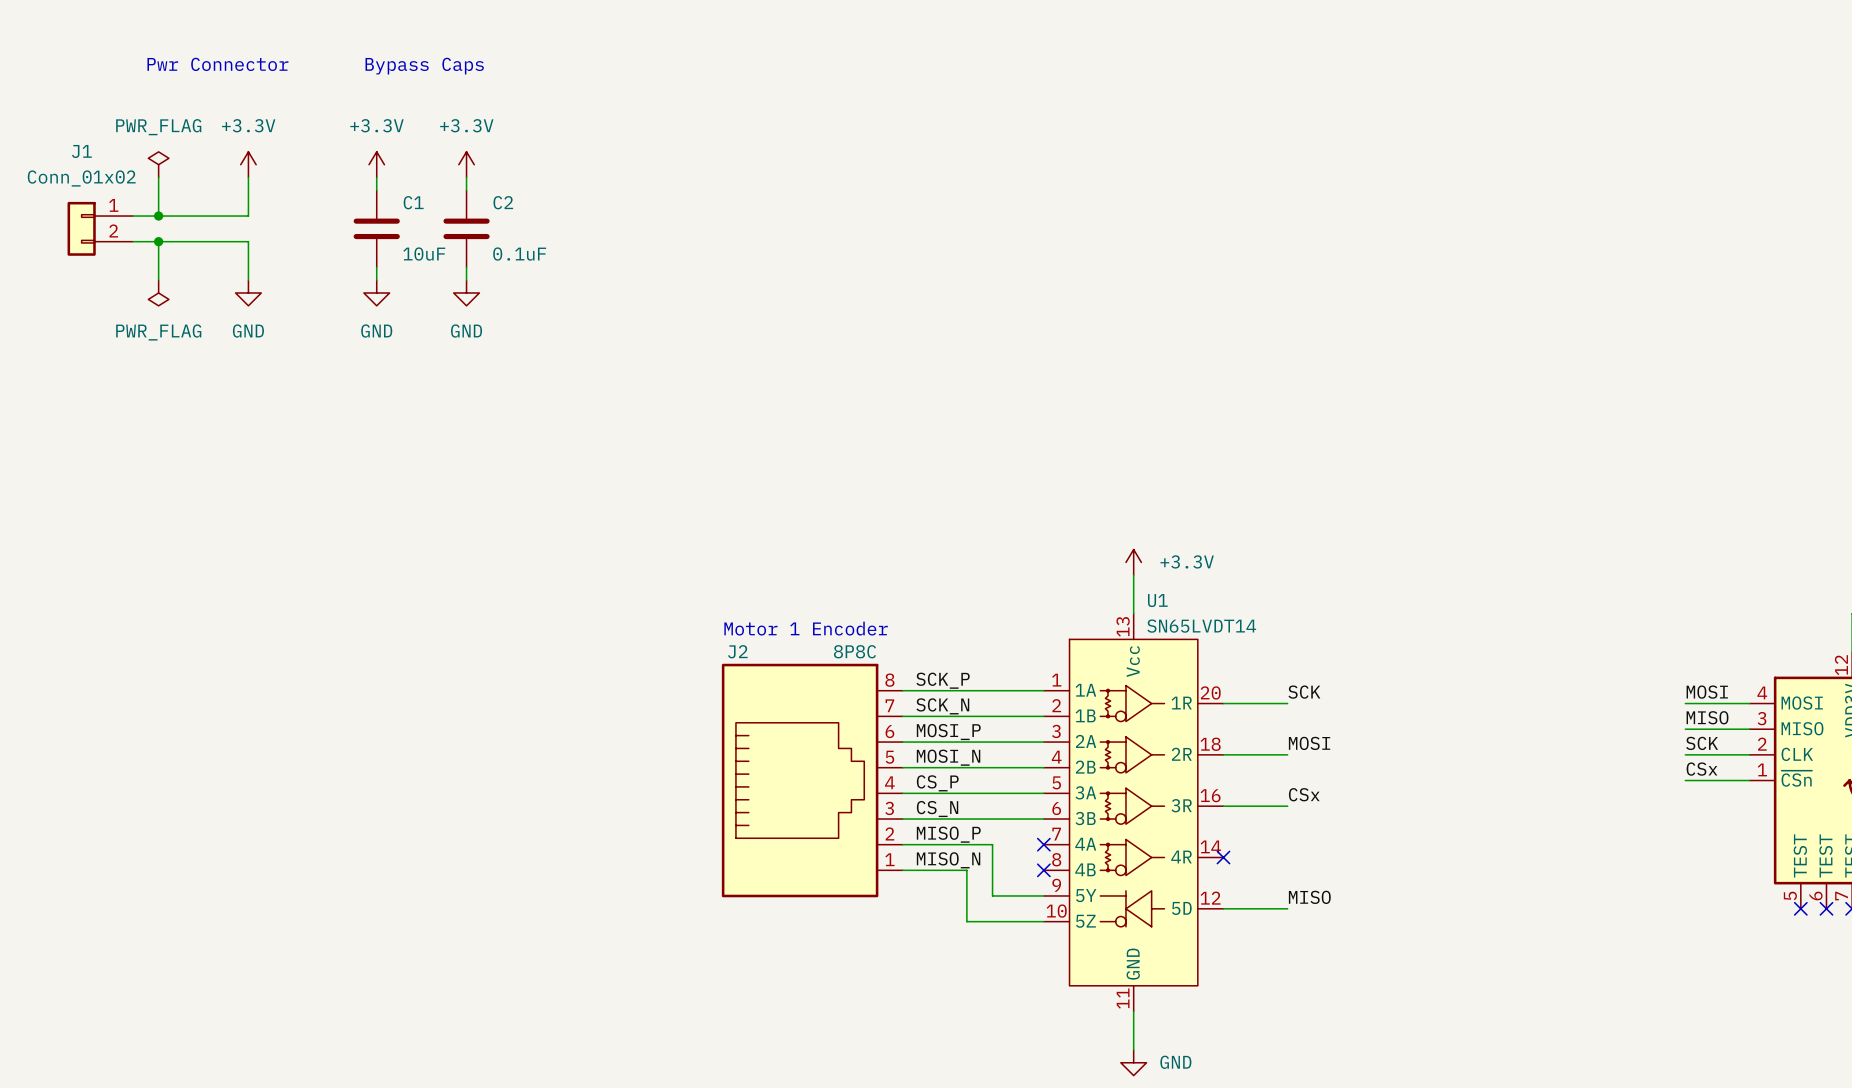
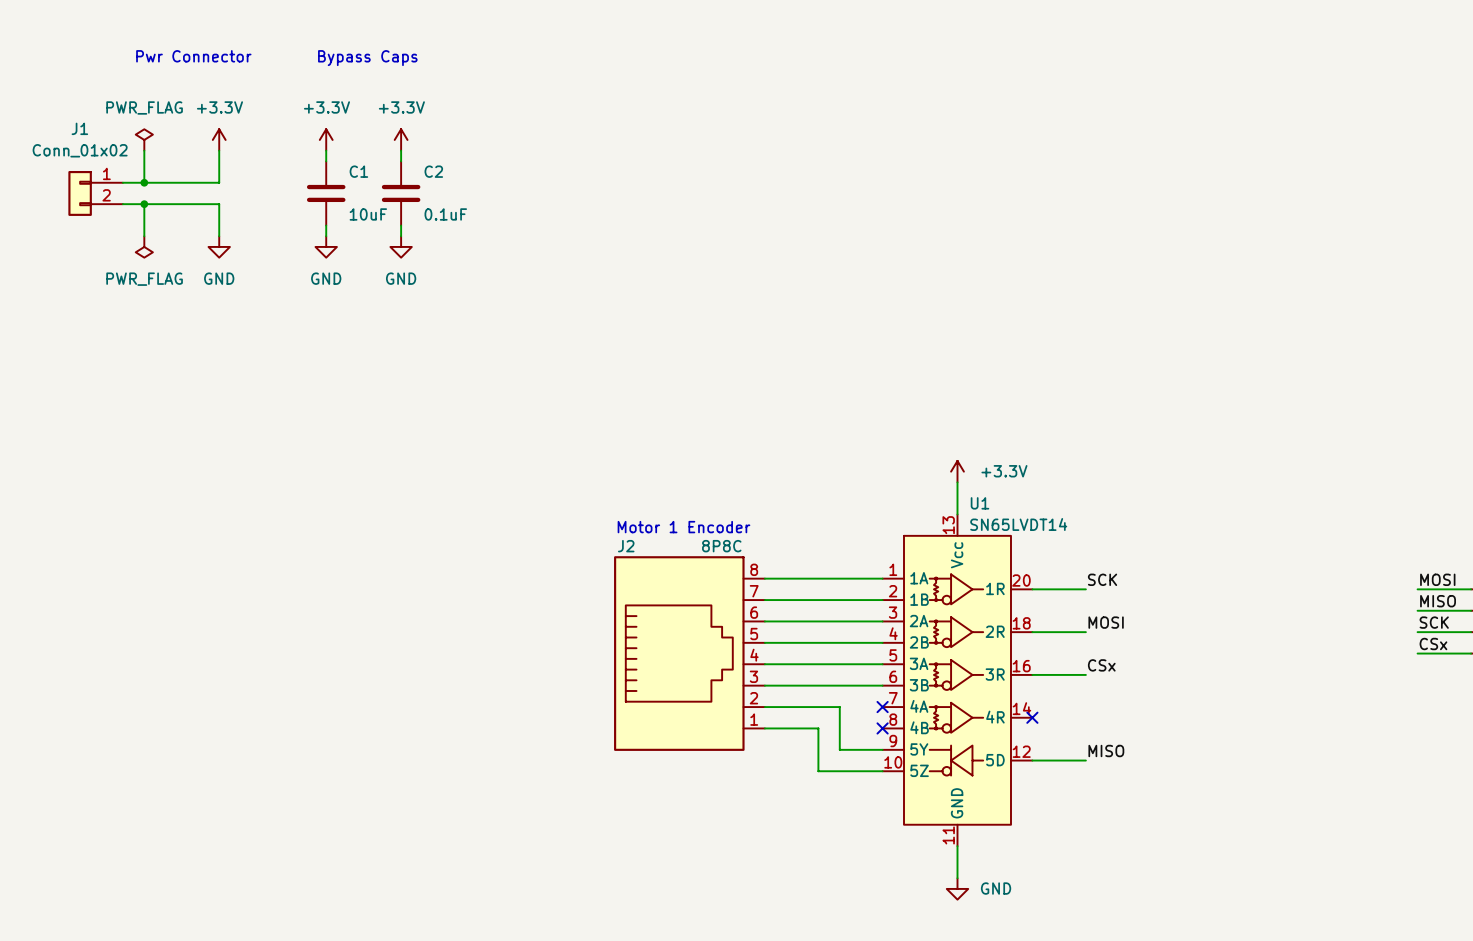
label: SCK_P (943, 680) -> none
label: SCK_N (942, 706) -> none
label: MOSI_P (948, 732) -> none
label: MOSI_N (948, 757) -> none
label: CS_P (937, 783) -> none
label: CS_N (937, 809) -> none
label: MISO_P (948, 834) -> none
label: MISO_N (948, 860) -> none

